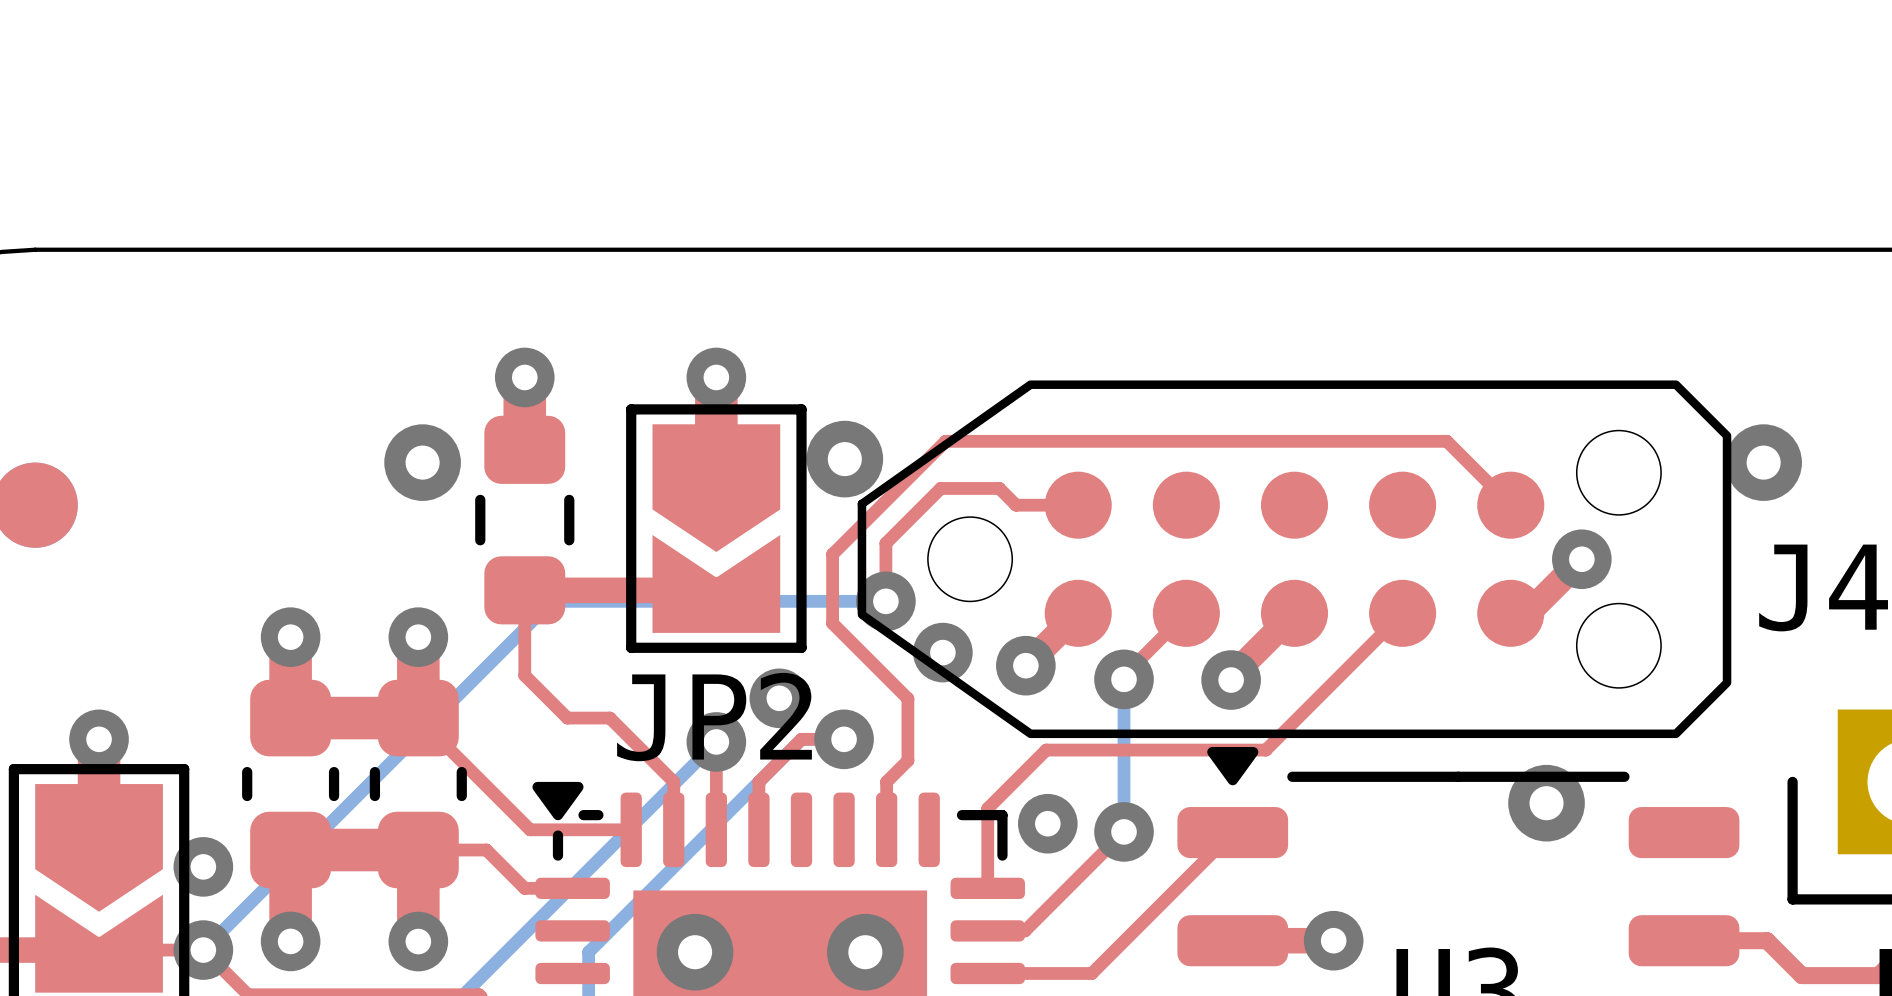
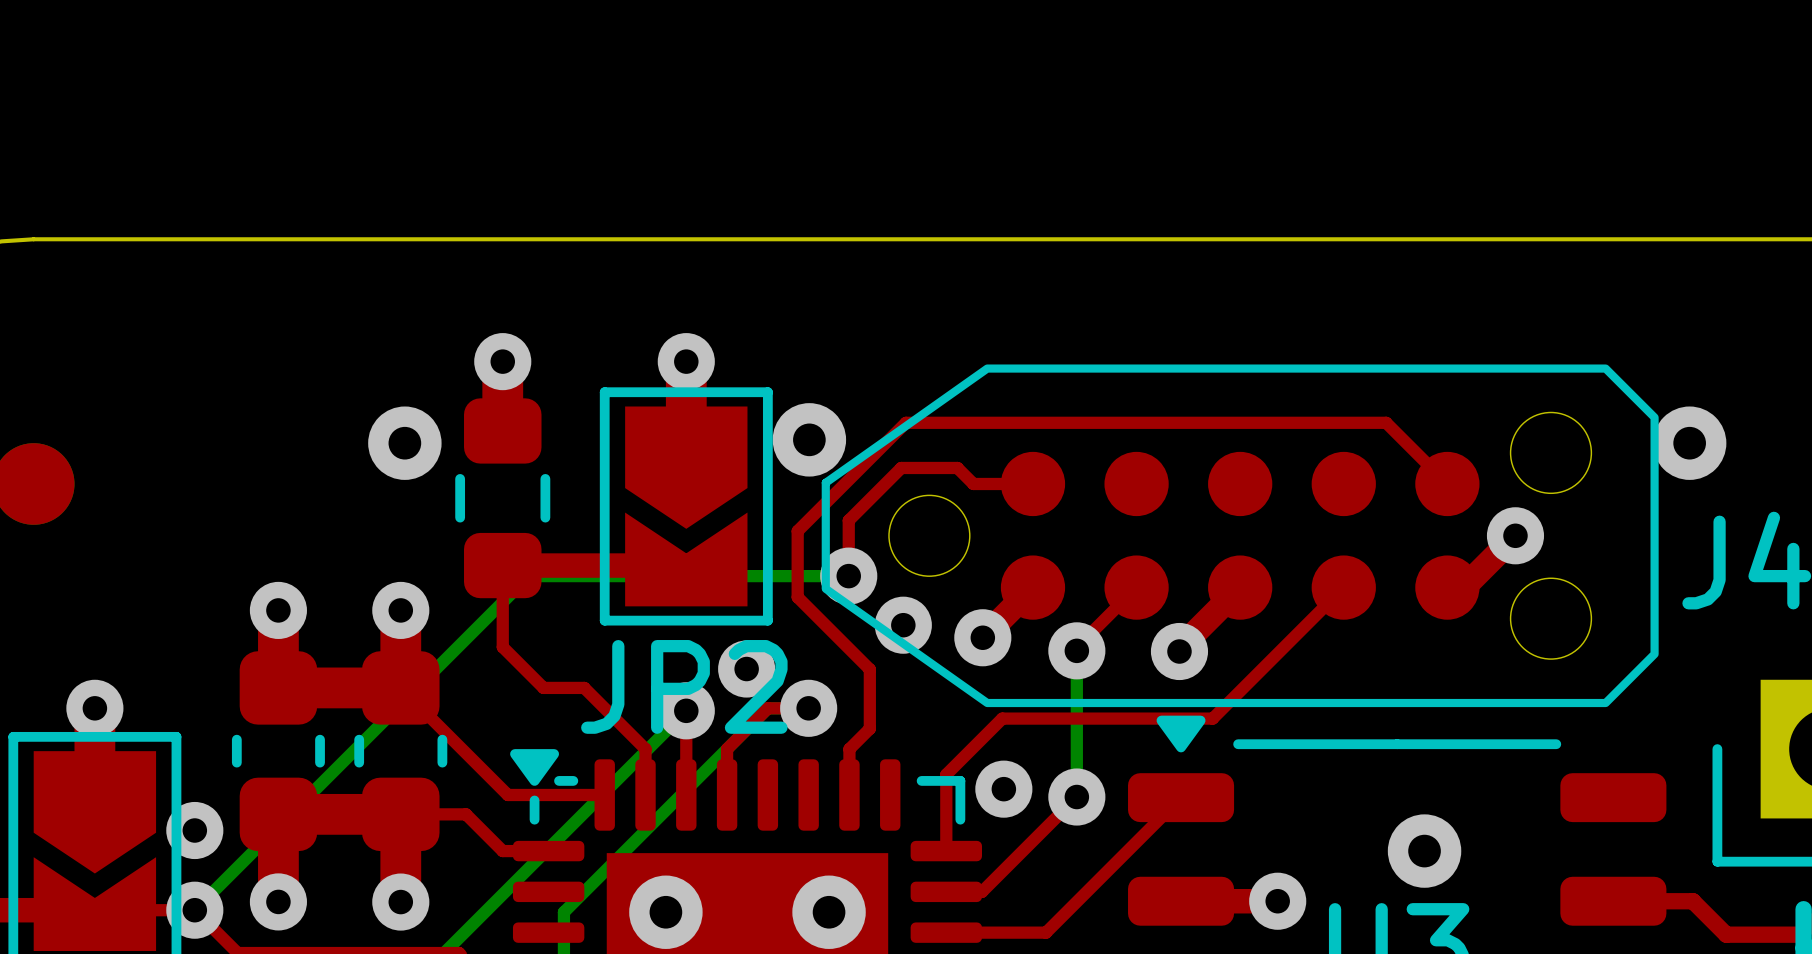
via position: (1546, 803) -> (1424, 851)

